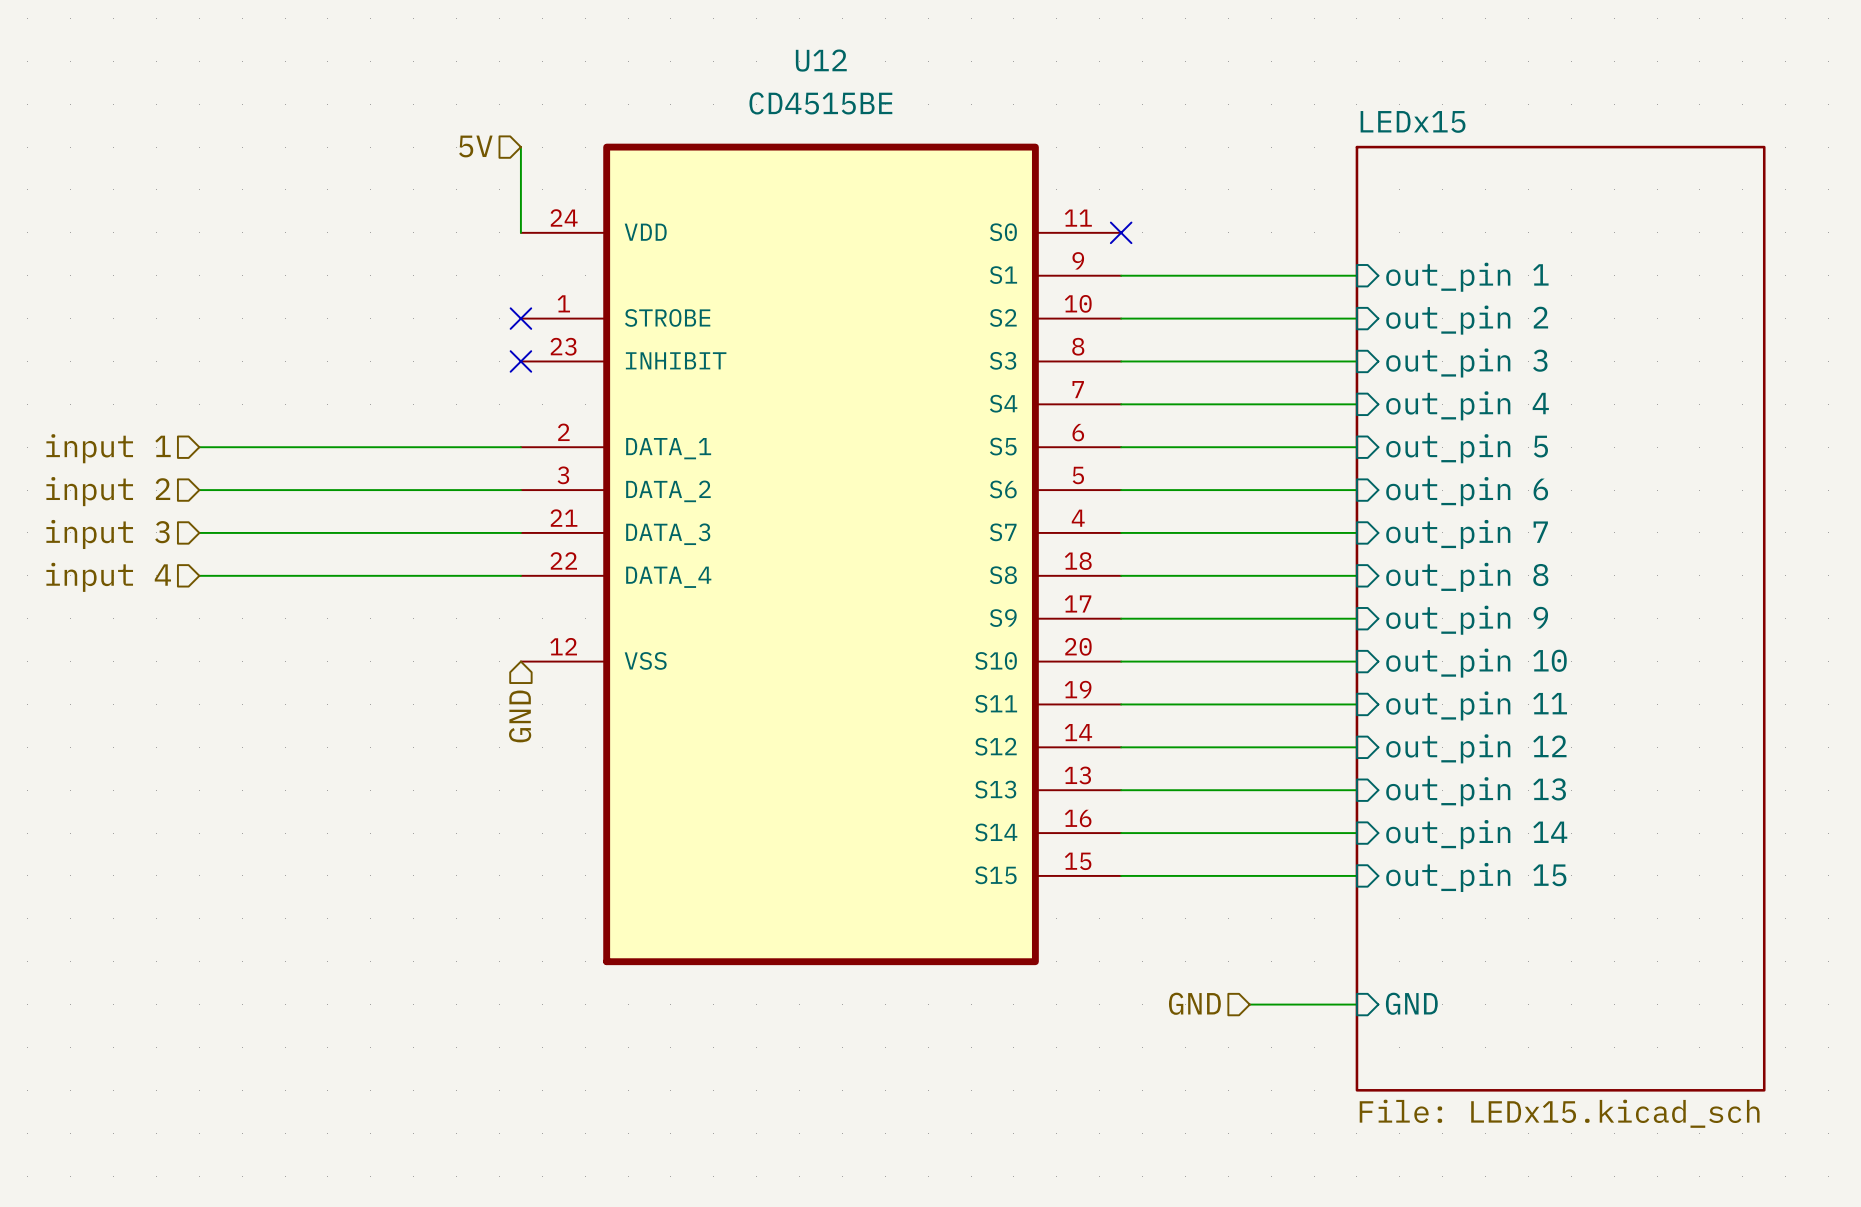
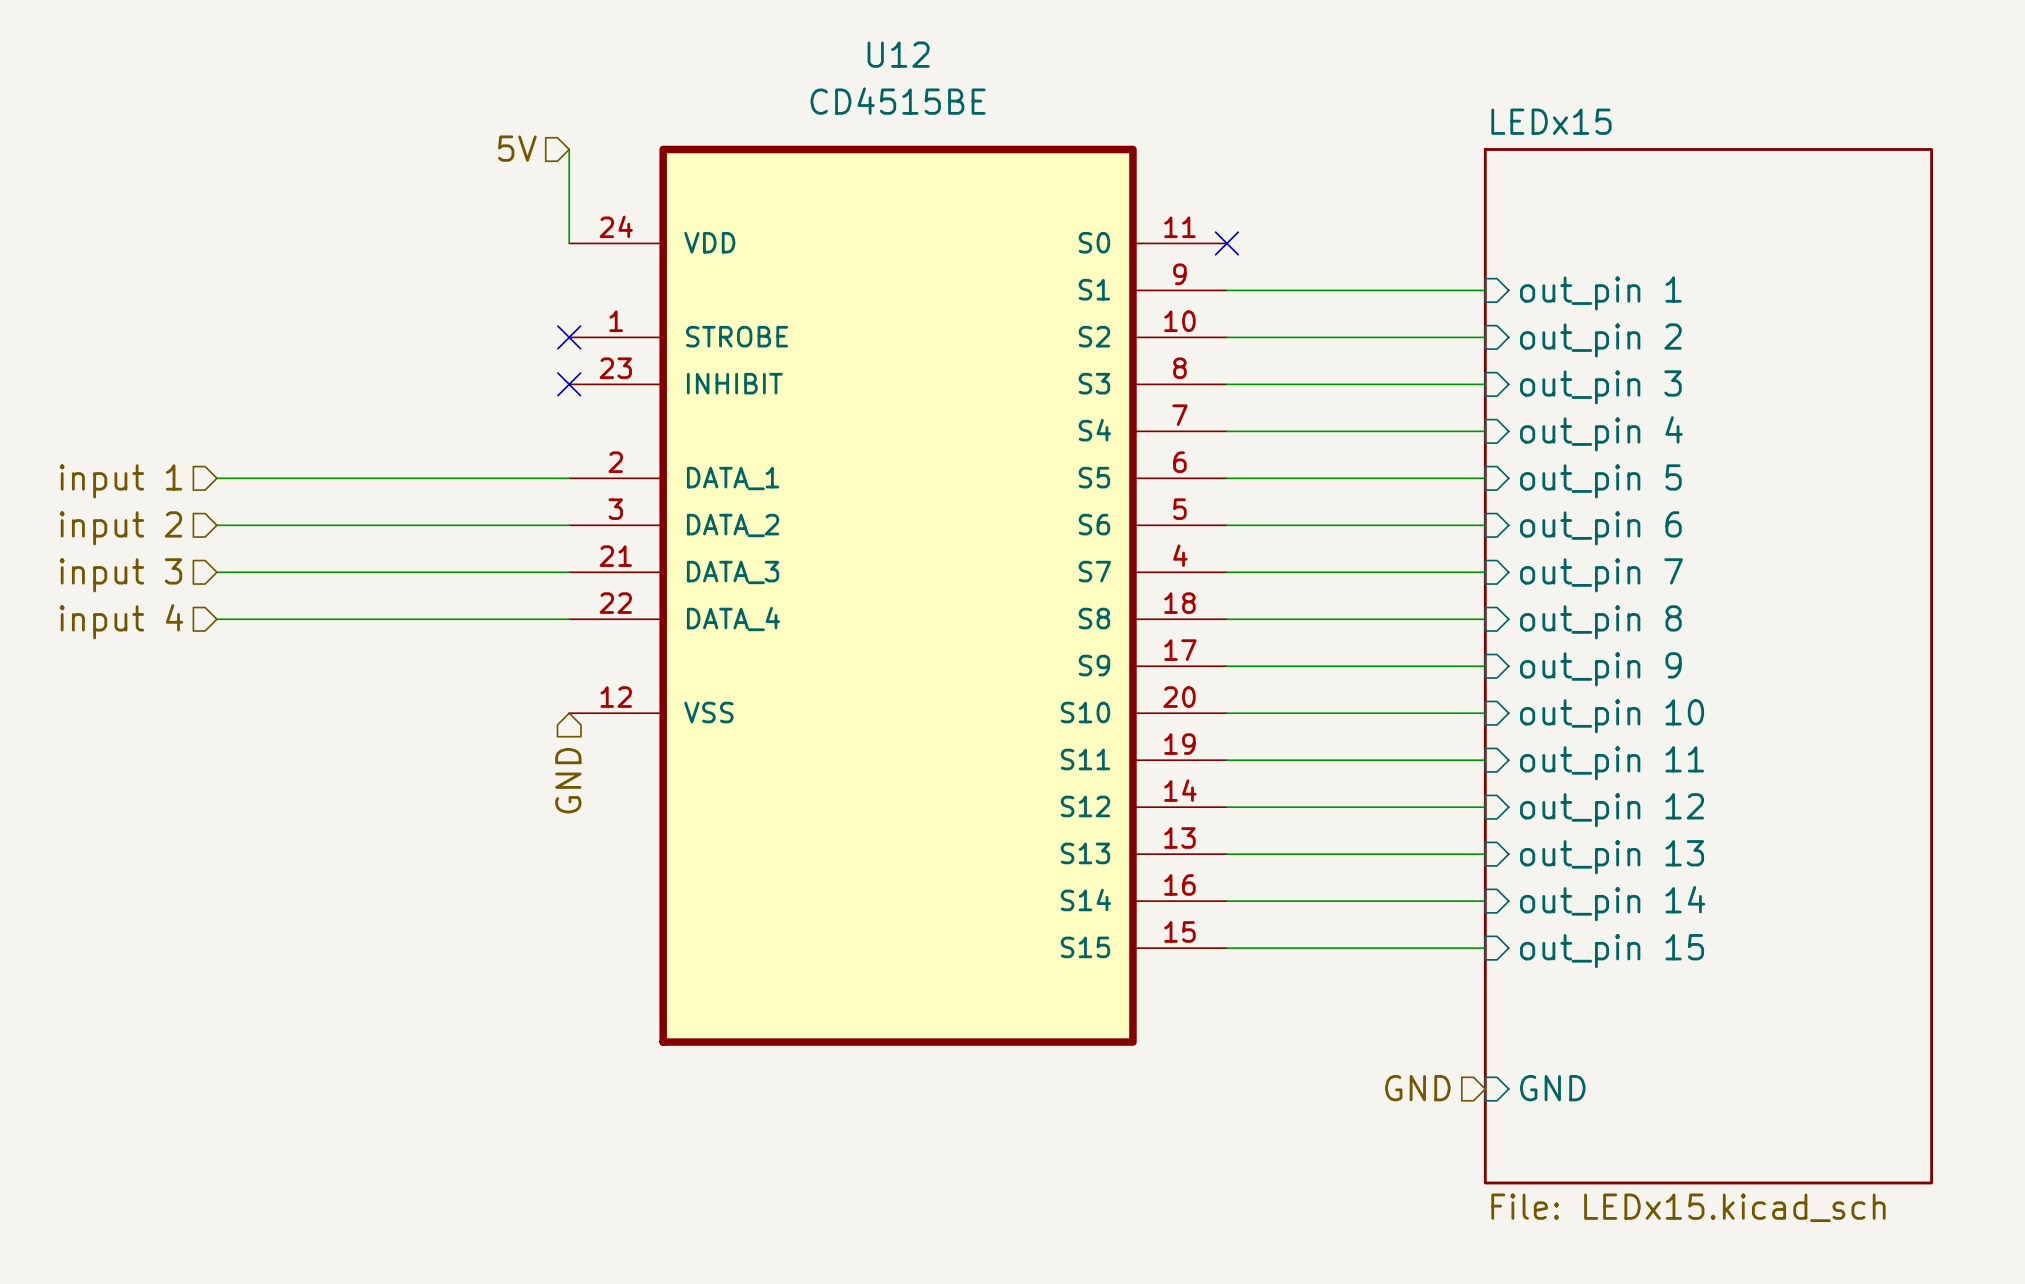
hierarchical label position: GND (1194, 1003) -> GND (1417, 1088)
wire: (1249, 1004) (1356, 1004) -> none

